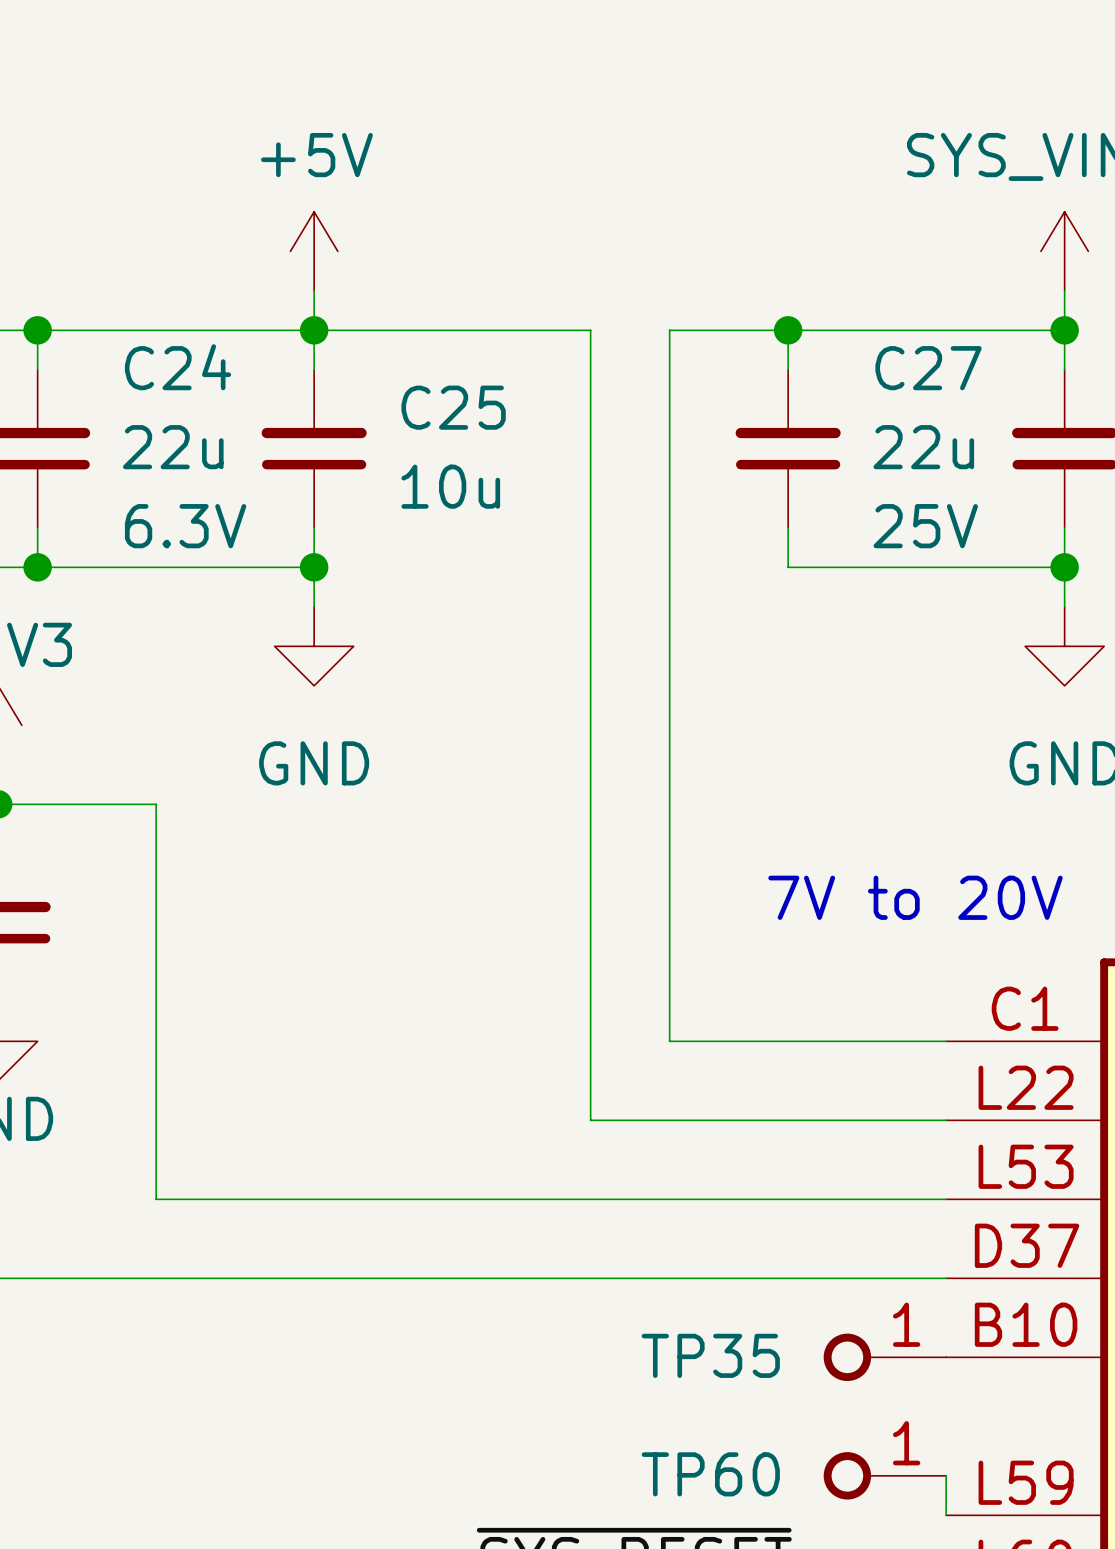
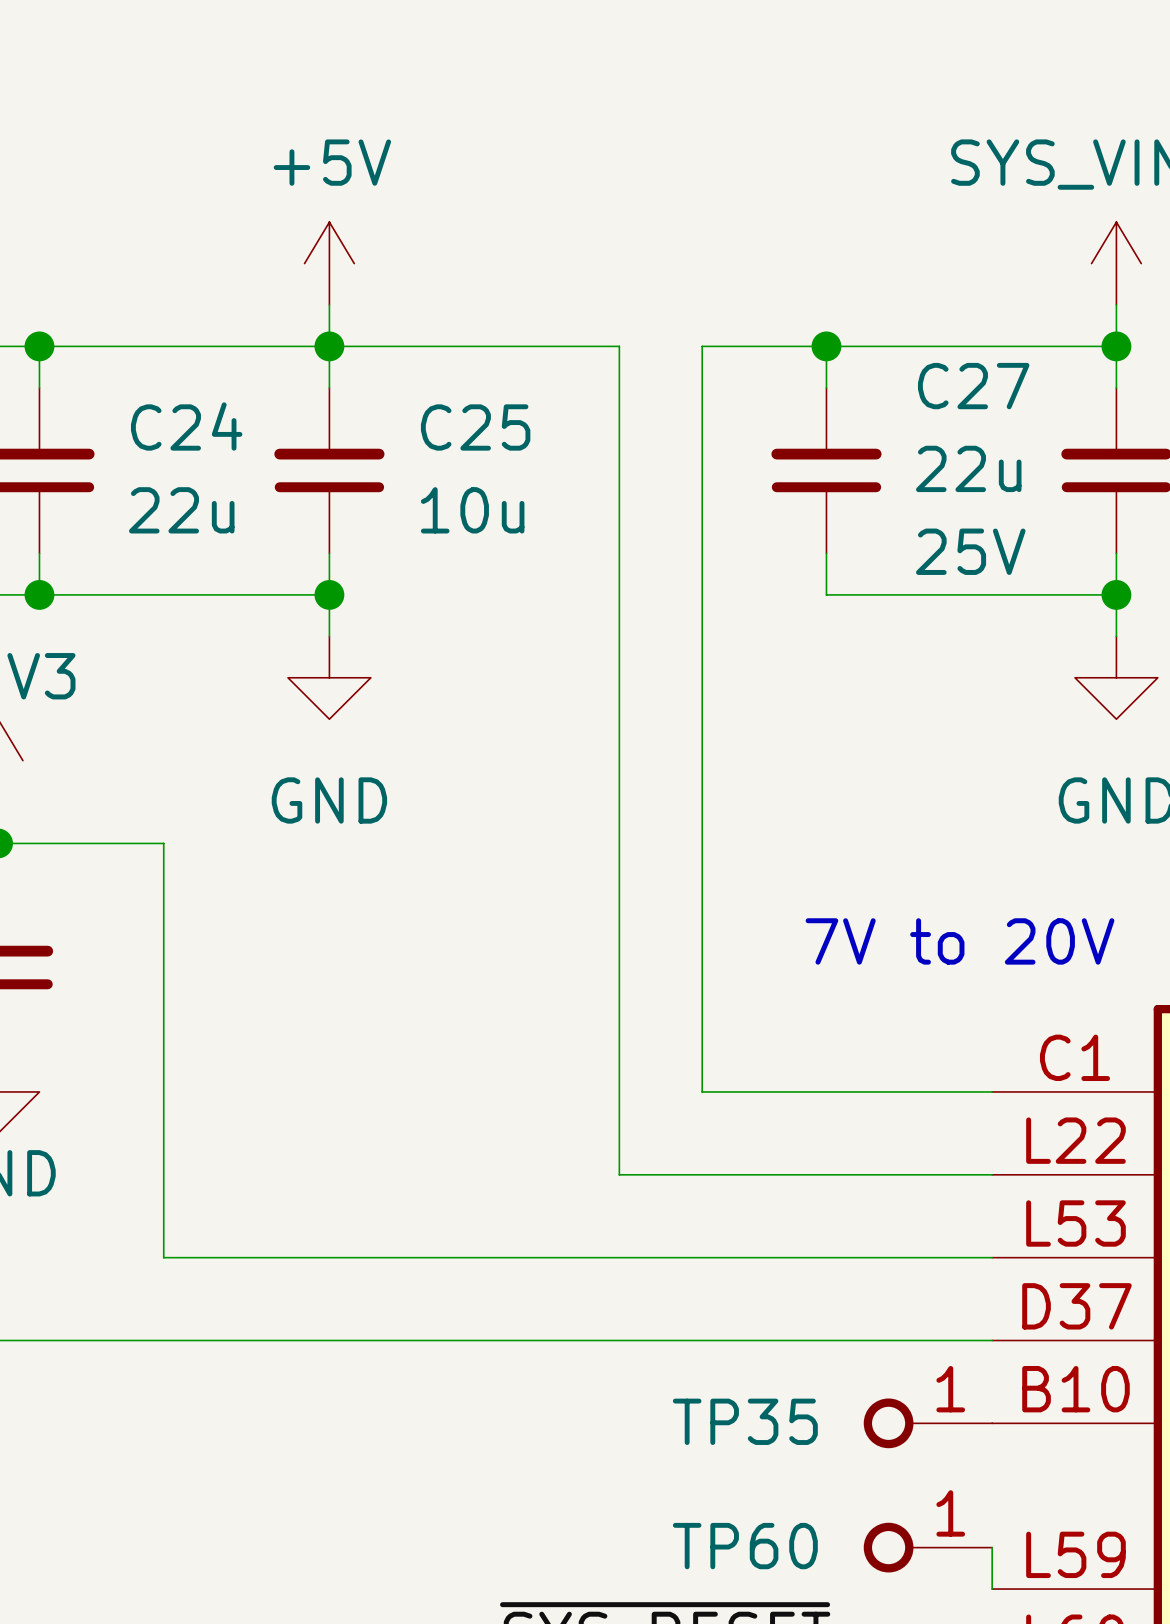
C24 name position: C24 (178, 367) -> C24 (186, 426)
C24 text position: 22u (173, 447) -> 22u (181, 510)
C24 text: 6.3V (185, 526) -> none

